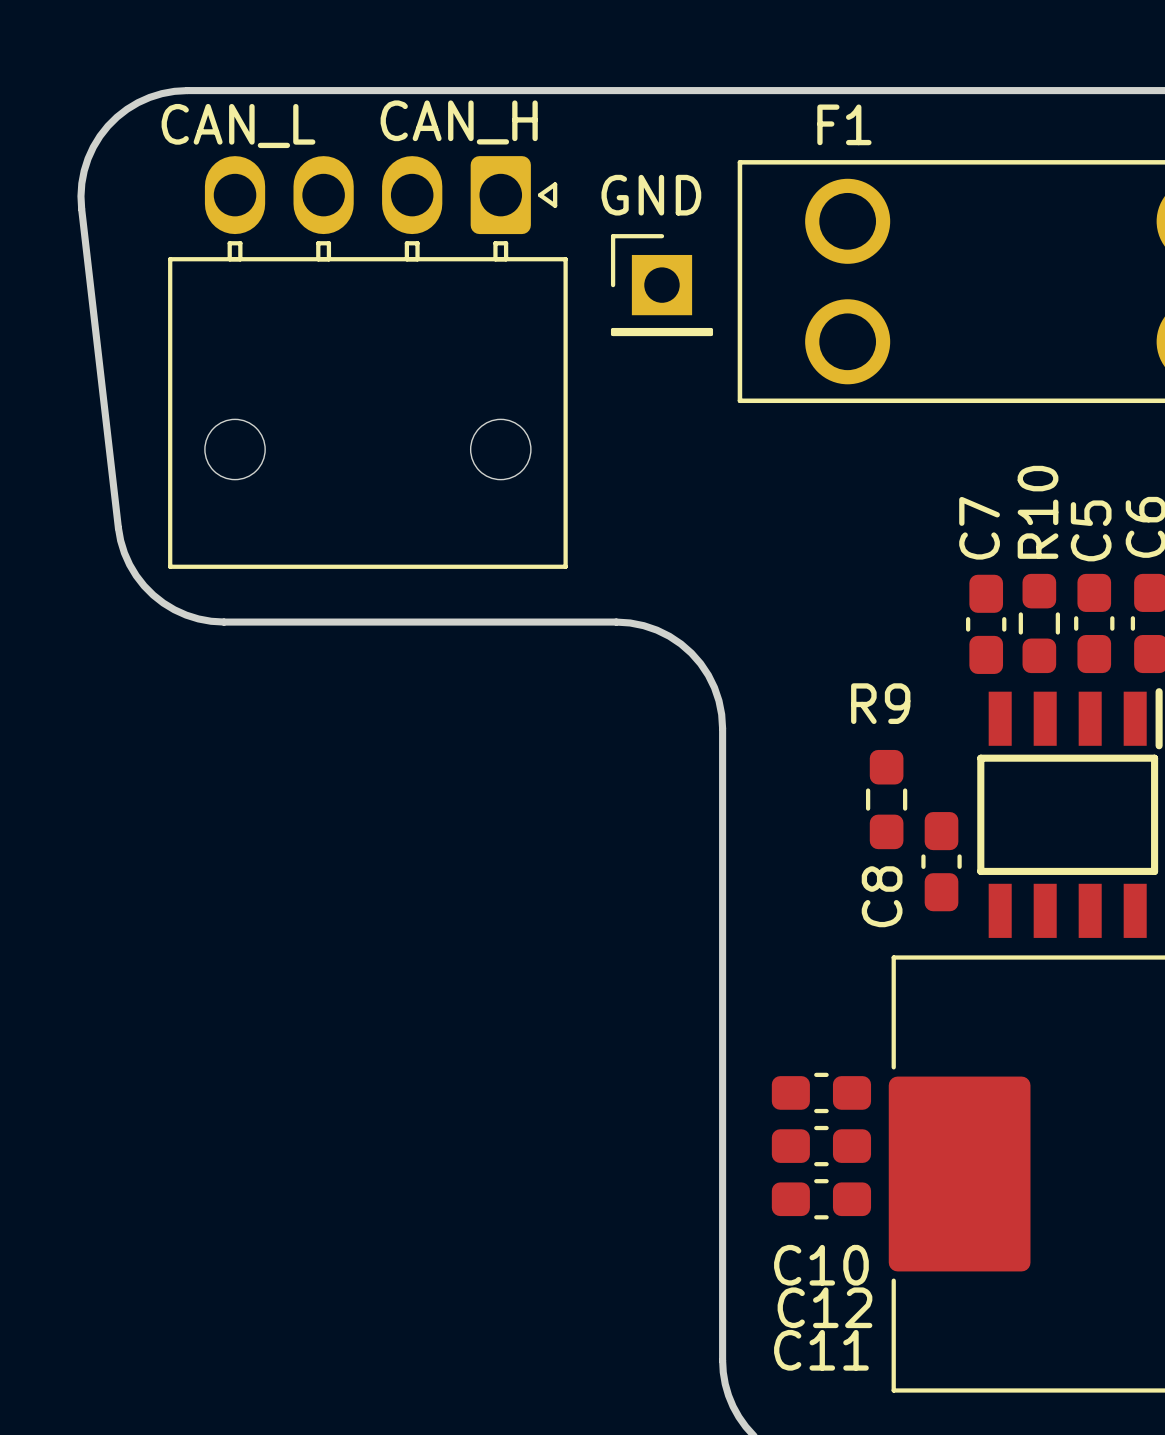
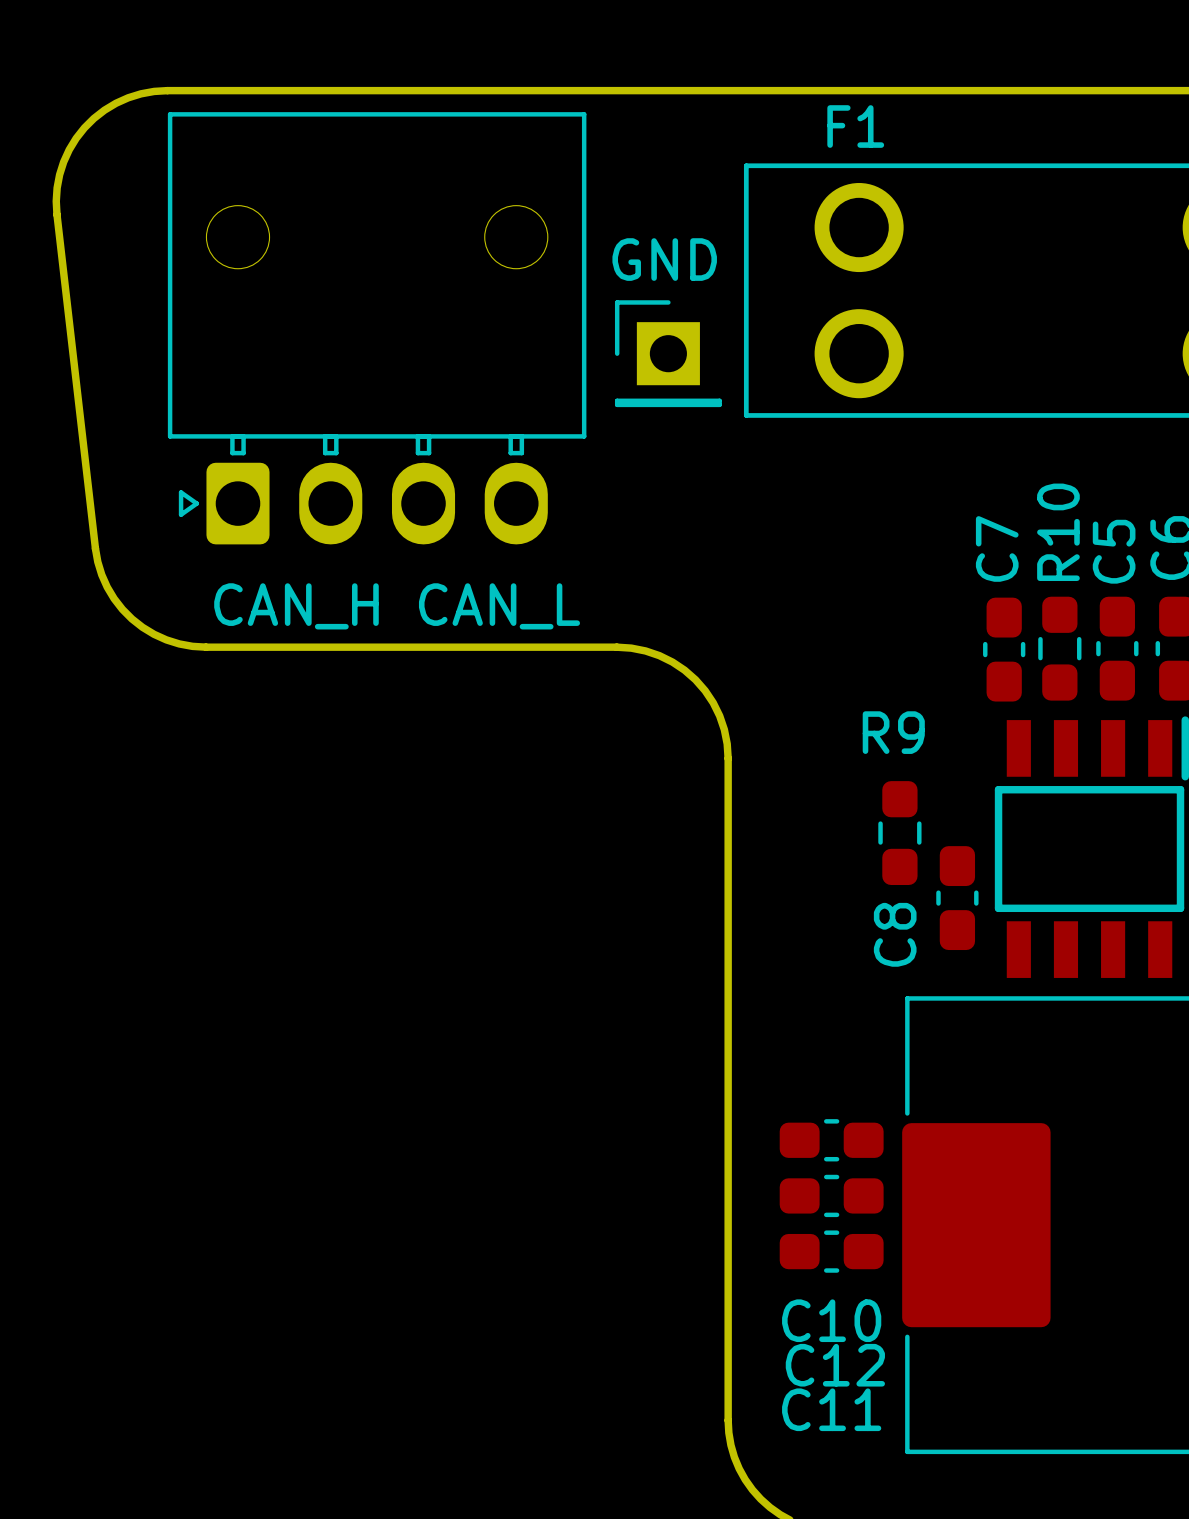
text position: CAN_H (459, 122) -> CAN_H (296, 606)
text position: CAN_L (238, 126) -> CAN_L (499, 606)
text position: GND (651, 195) -> GND (664, 259)
part position: (661, 285) -> (668, 353)
part rotation: 0° (367, 362) -> 180° (377, 328)

